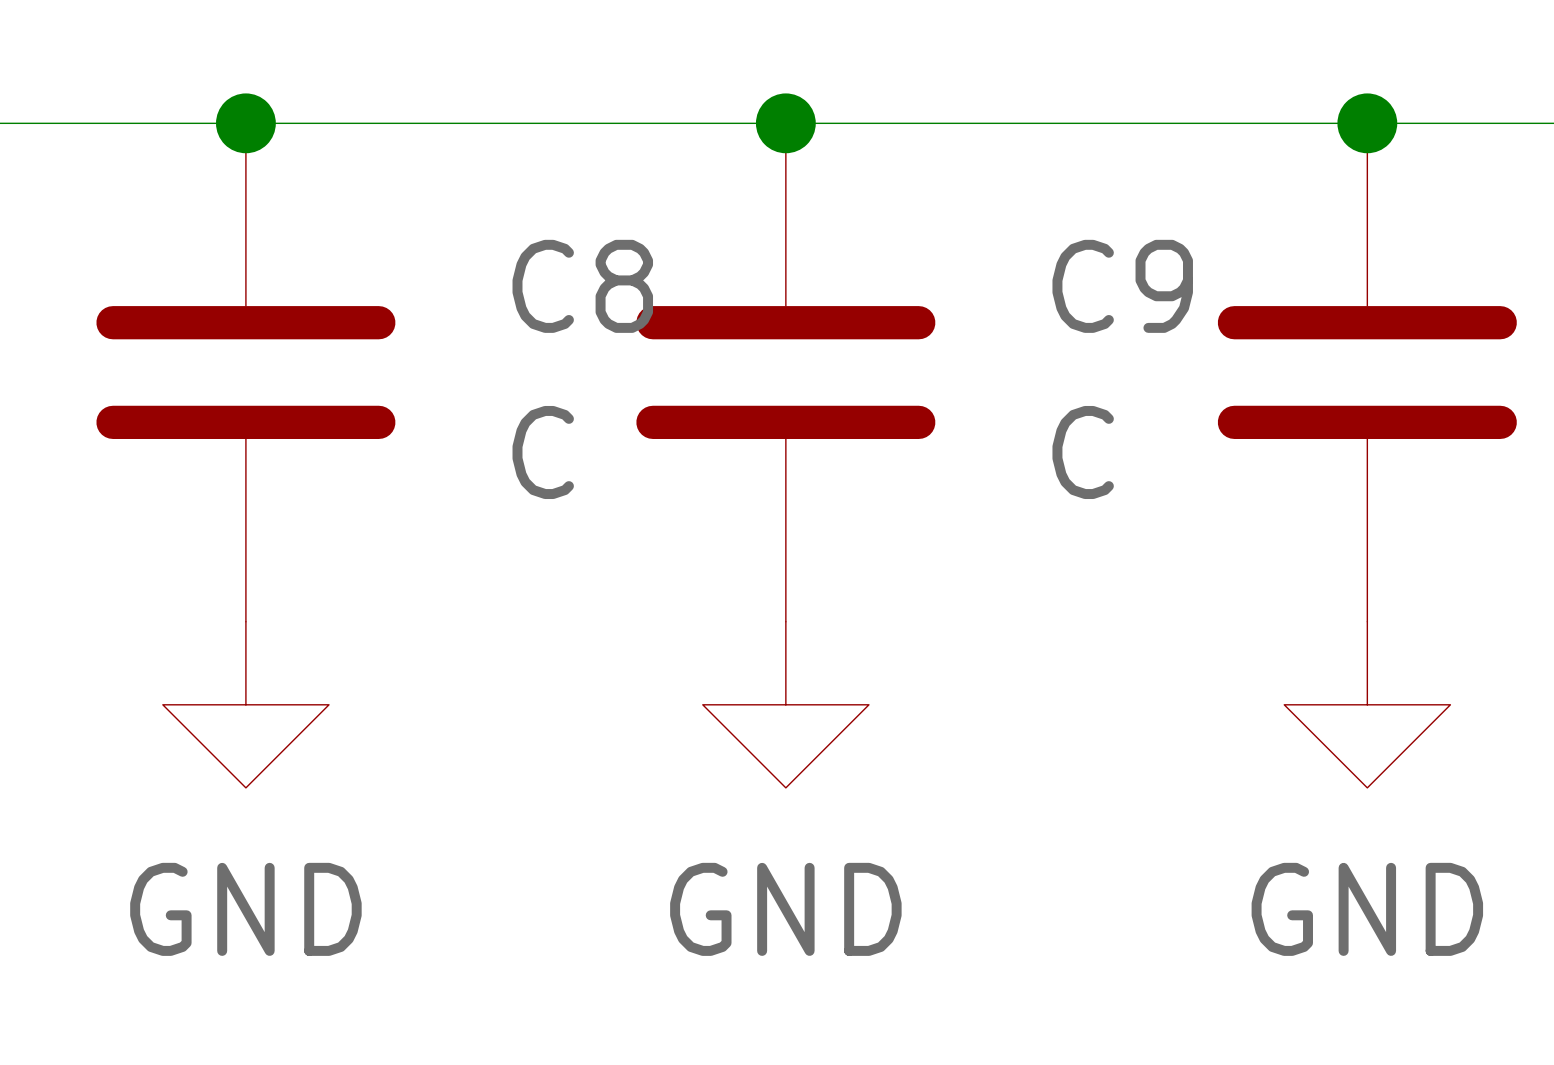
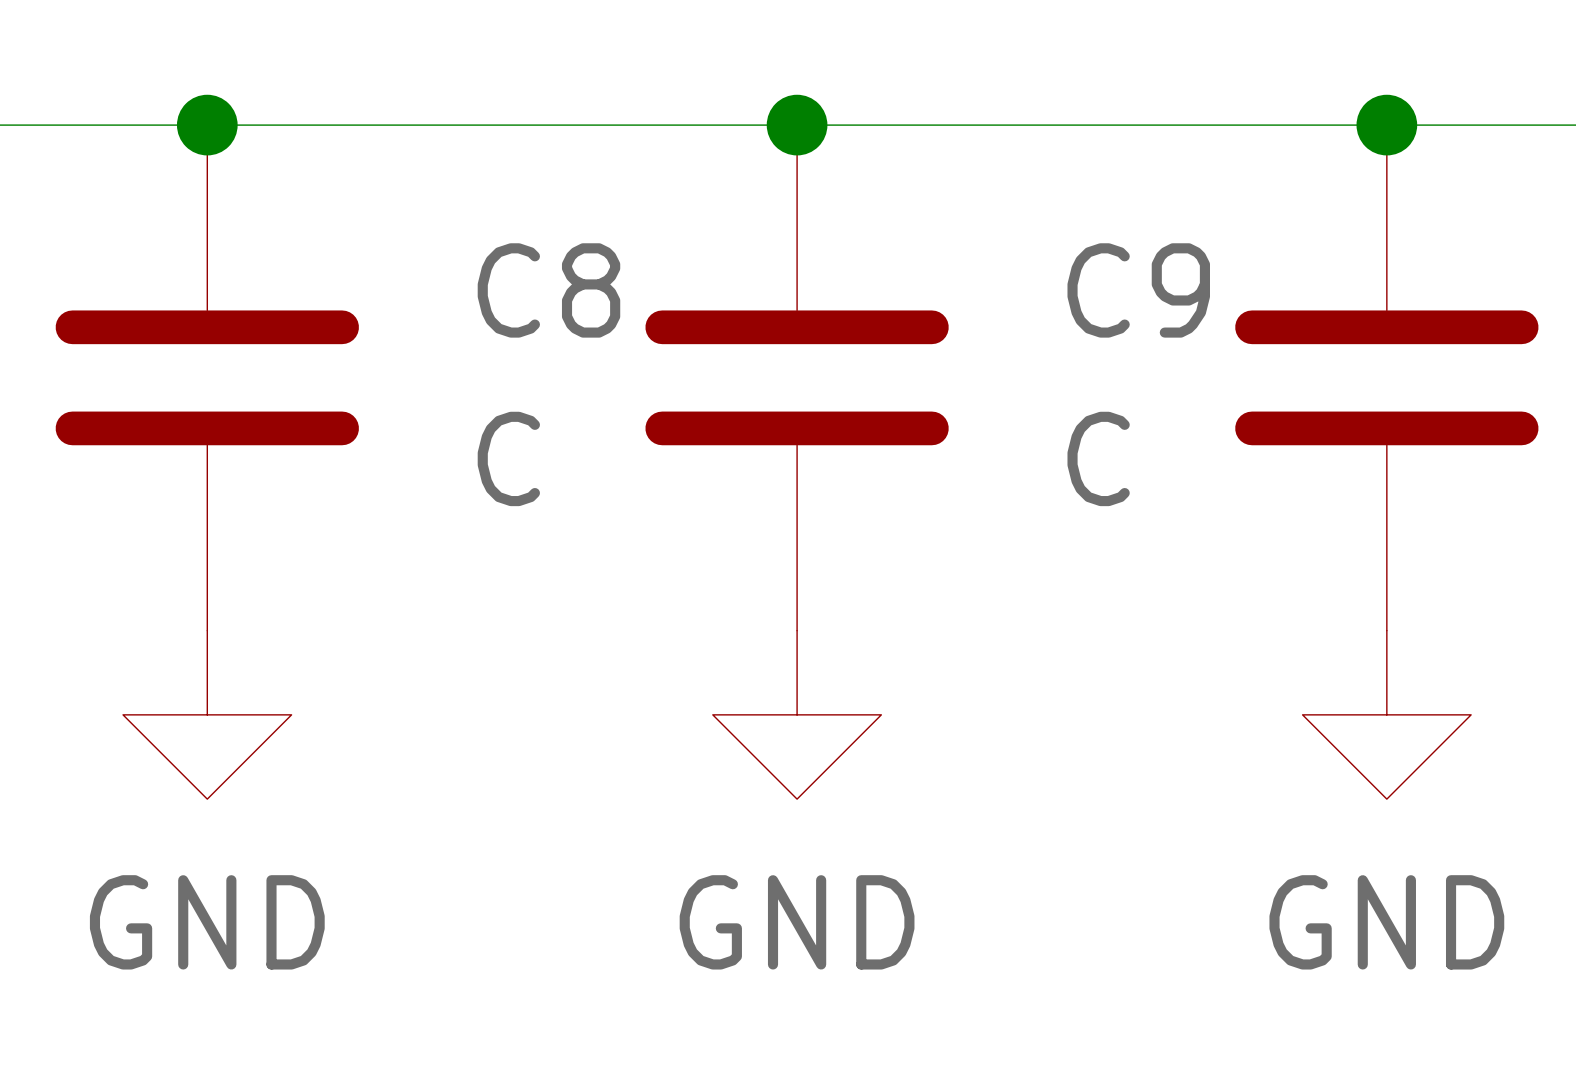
junction position: (245, 123) -> (207, 125)
C8 position: (245, 372) -> (207, 377)
power symbol position: GND (245, 704) -> GND (207, 714)

